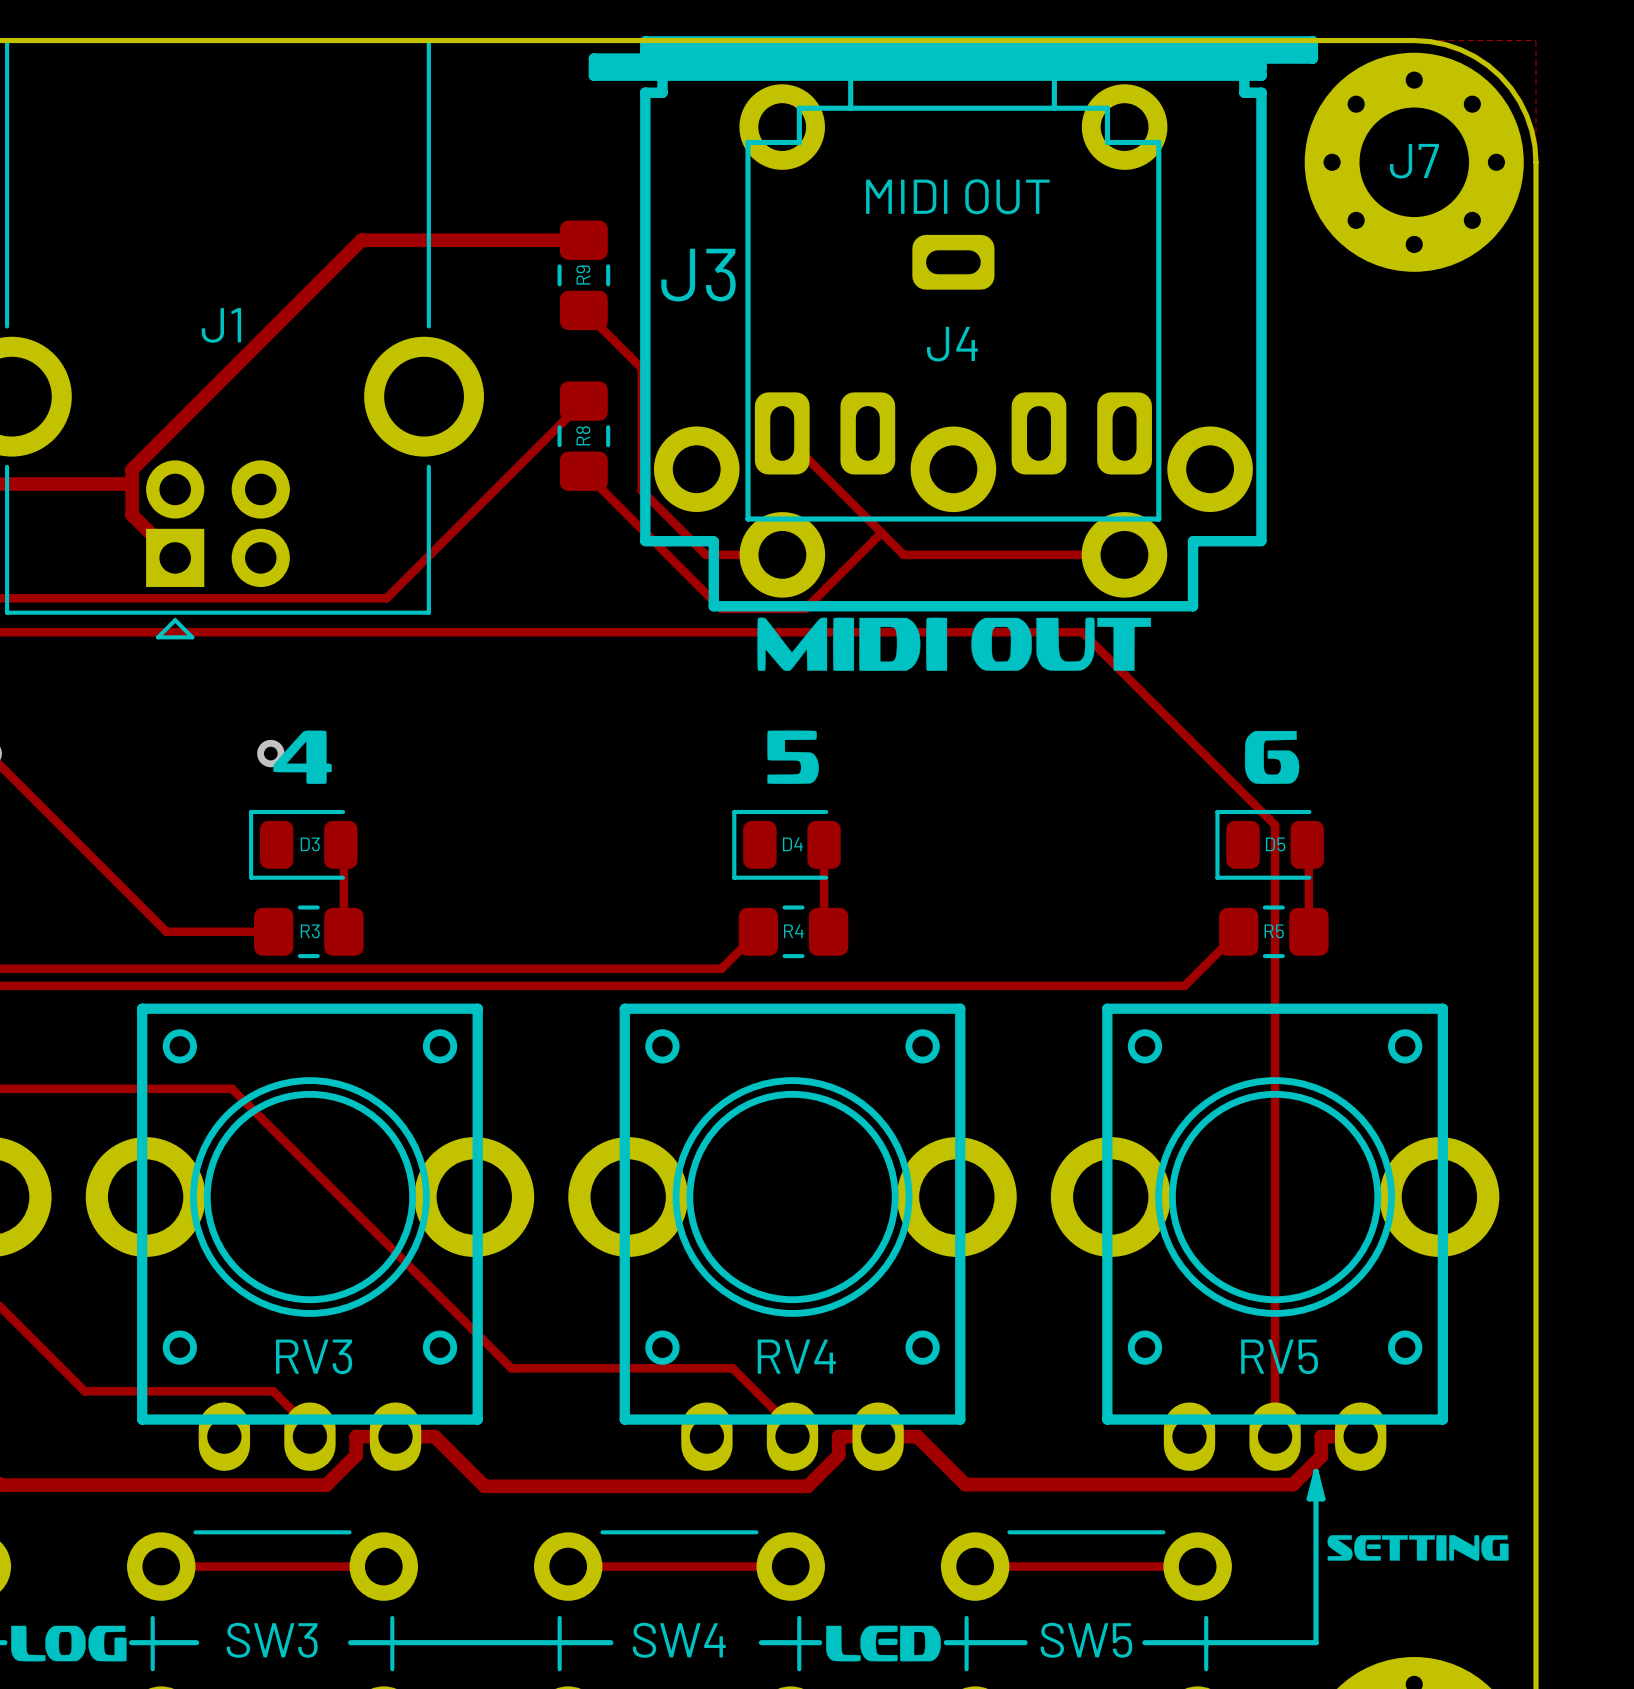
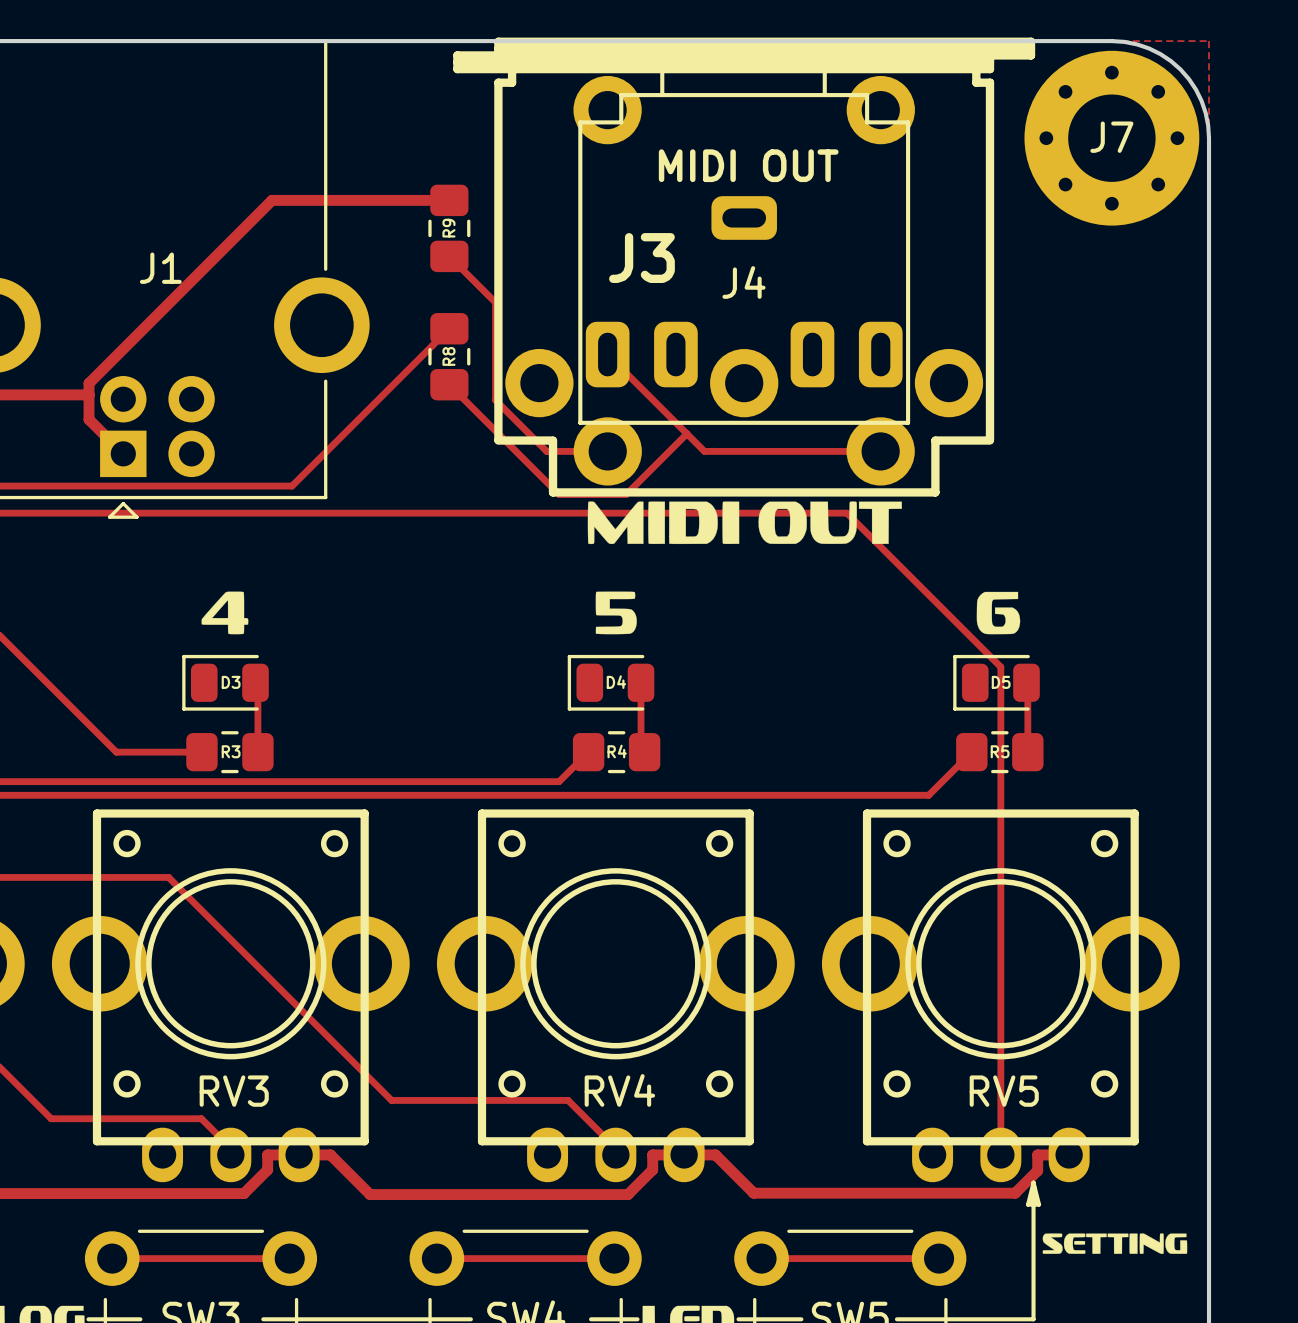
J3 name position: J3 (698, 275) -> J3 (641, 258)
via: (270, 753) -> none

